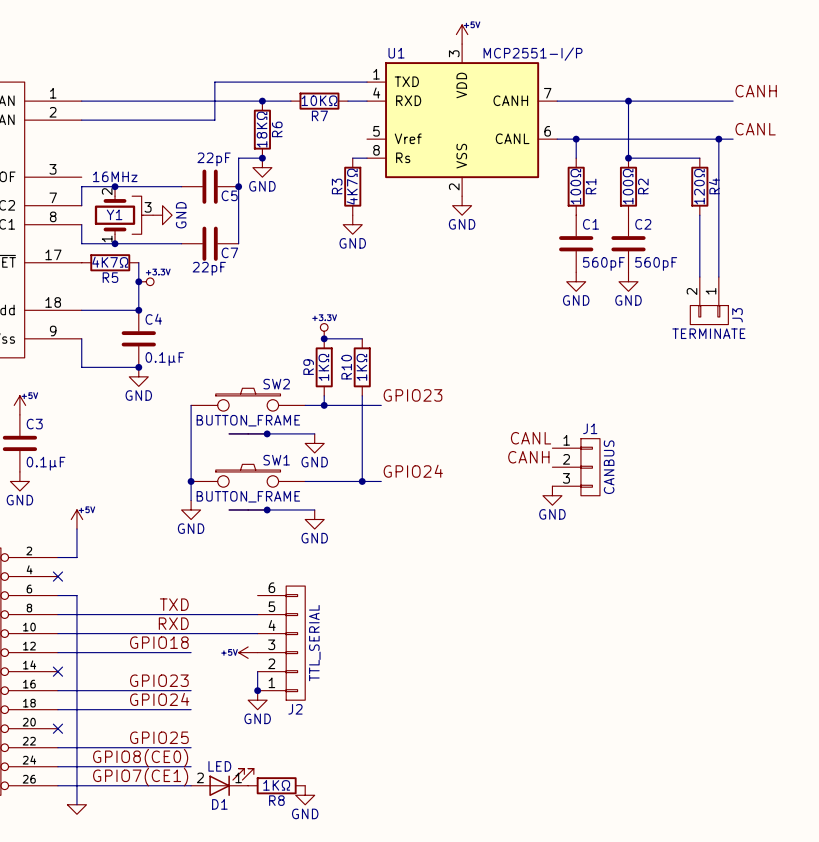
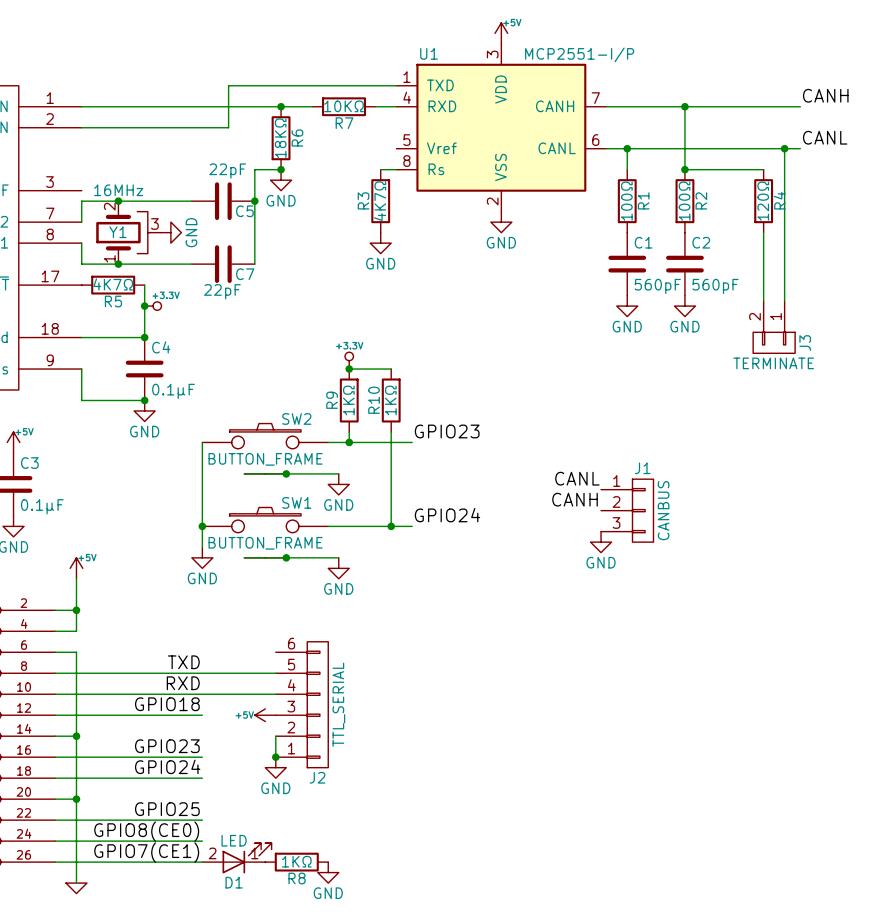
wire: none -> (76, 610) (76, 631) (55, 631)
junction: none -> (76, 610)
no-connect mark: (57, 576) -> none
wire: none -> (55, 736) (76, 736)
no-connect mark: (57, 671) -> none
junction: none -> (76, 736)
wire: none -> (55, 799) (76, 799)
no-connect mark: (57, 728) -> none
junction: none -> (76, 799)

